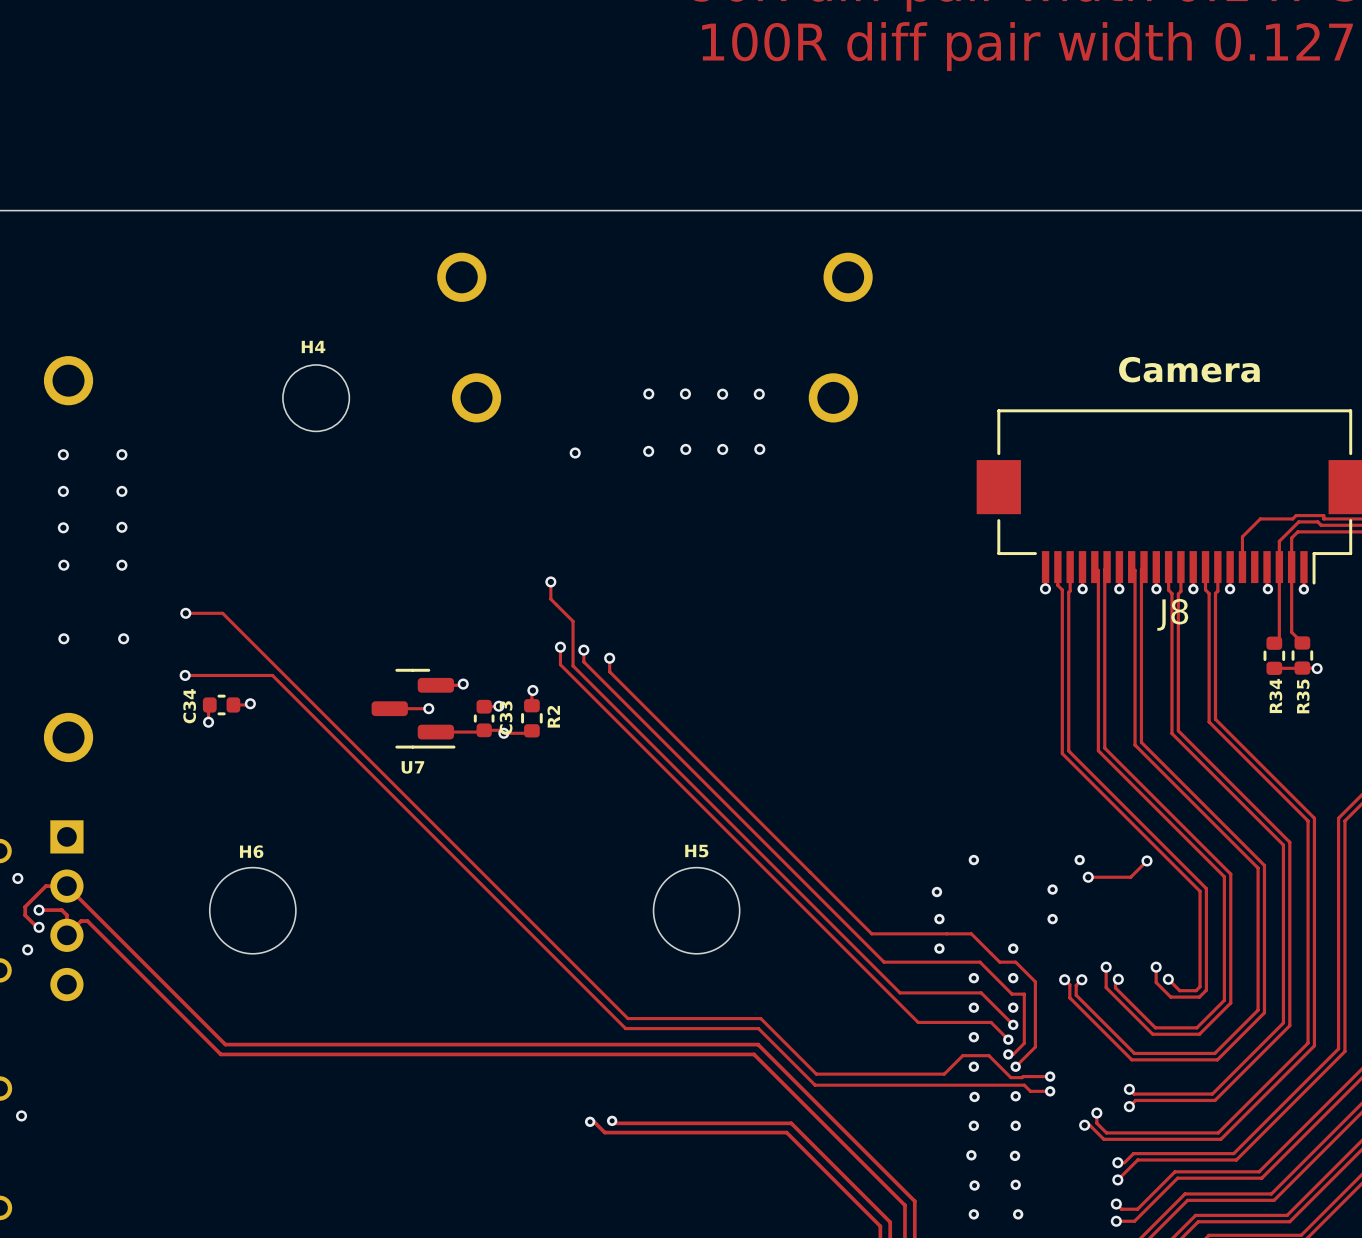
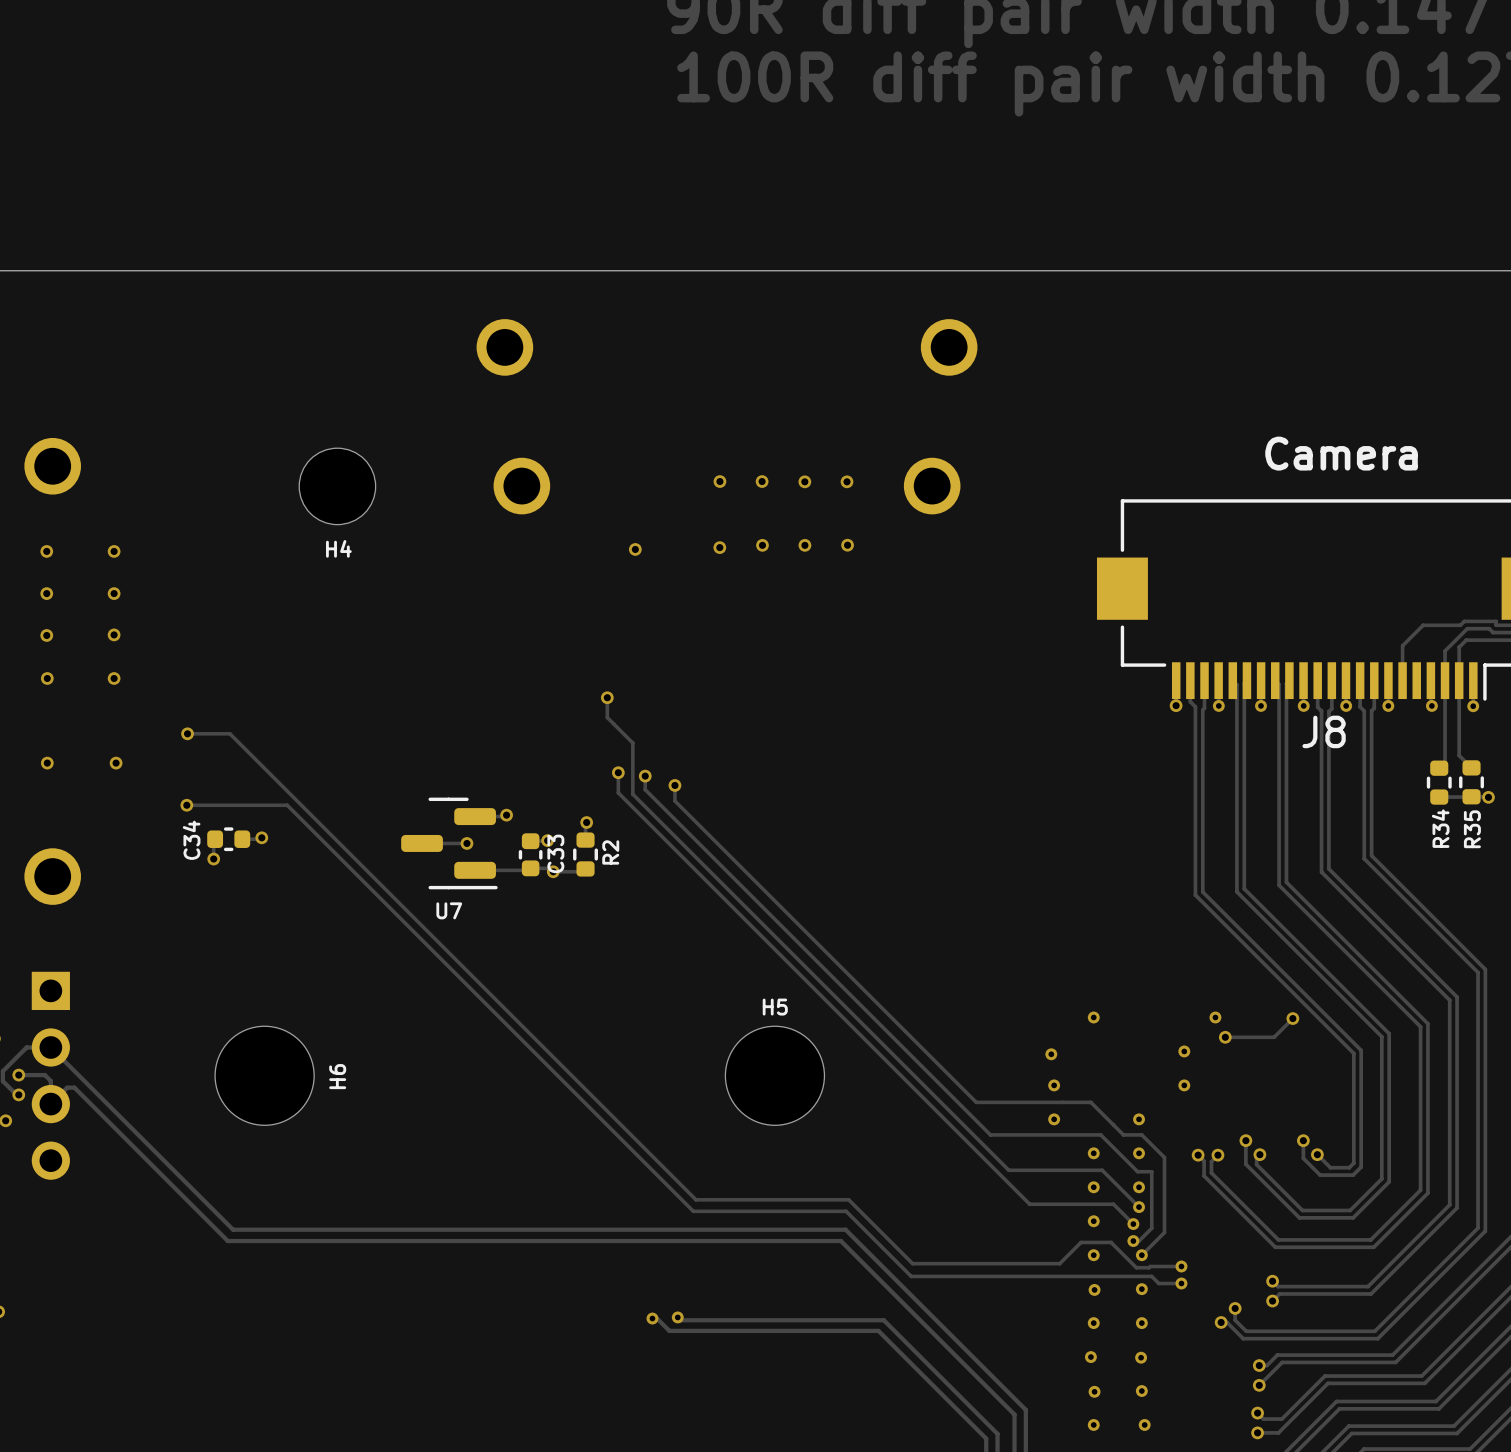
H4 name position: H4 (313, 346) -> H4 (338, 548)
H6 name rotation: 0° (251, 851) -> 90° counterclockwise (337, 1076)
H6 name position: H6 (251, 851) -> H6 (337, 1076)

